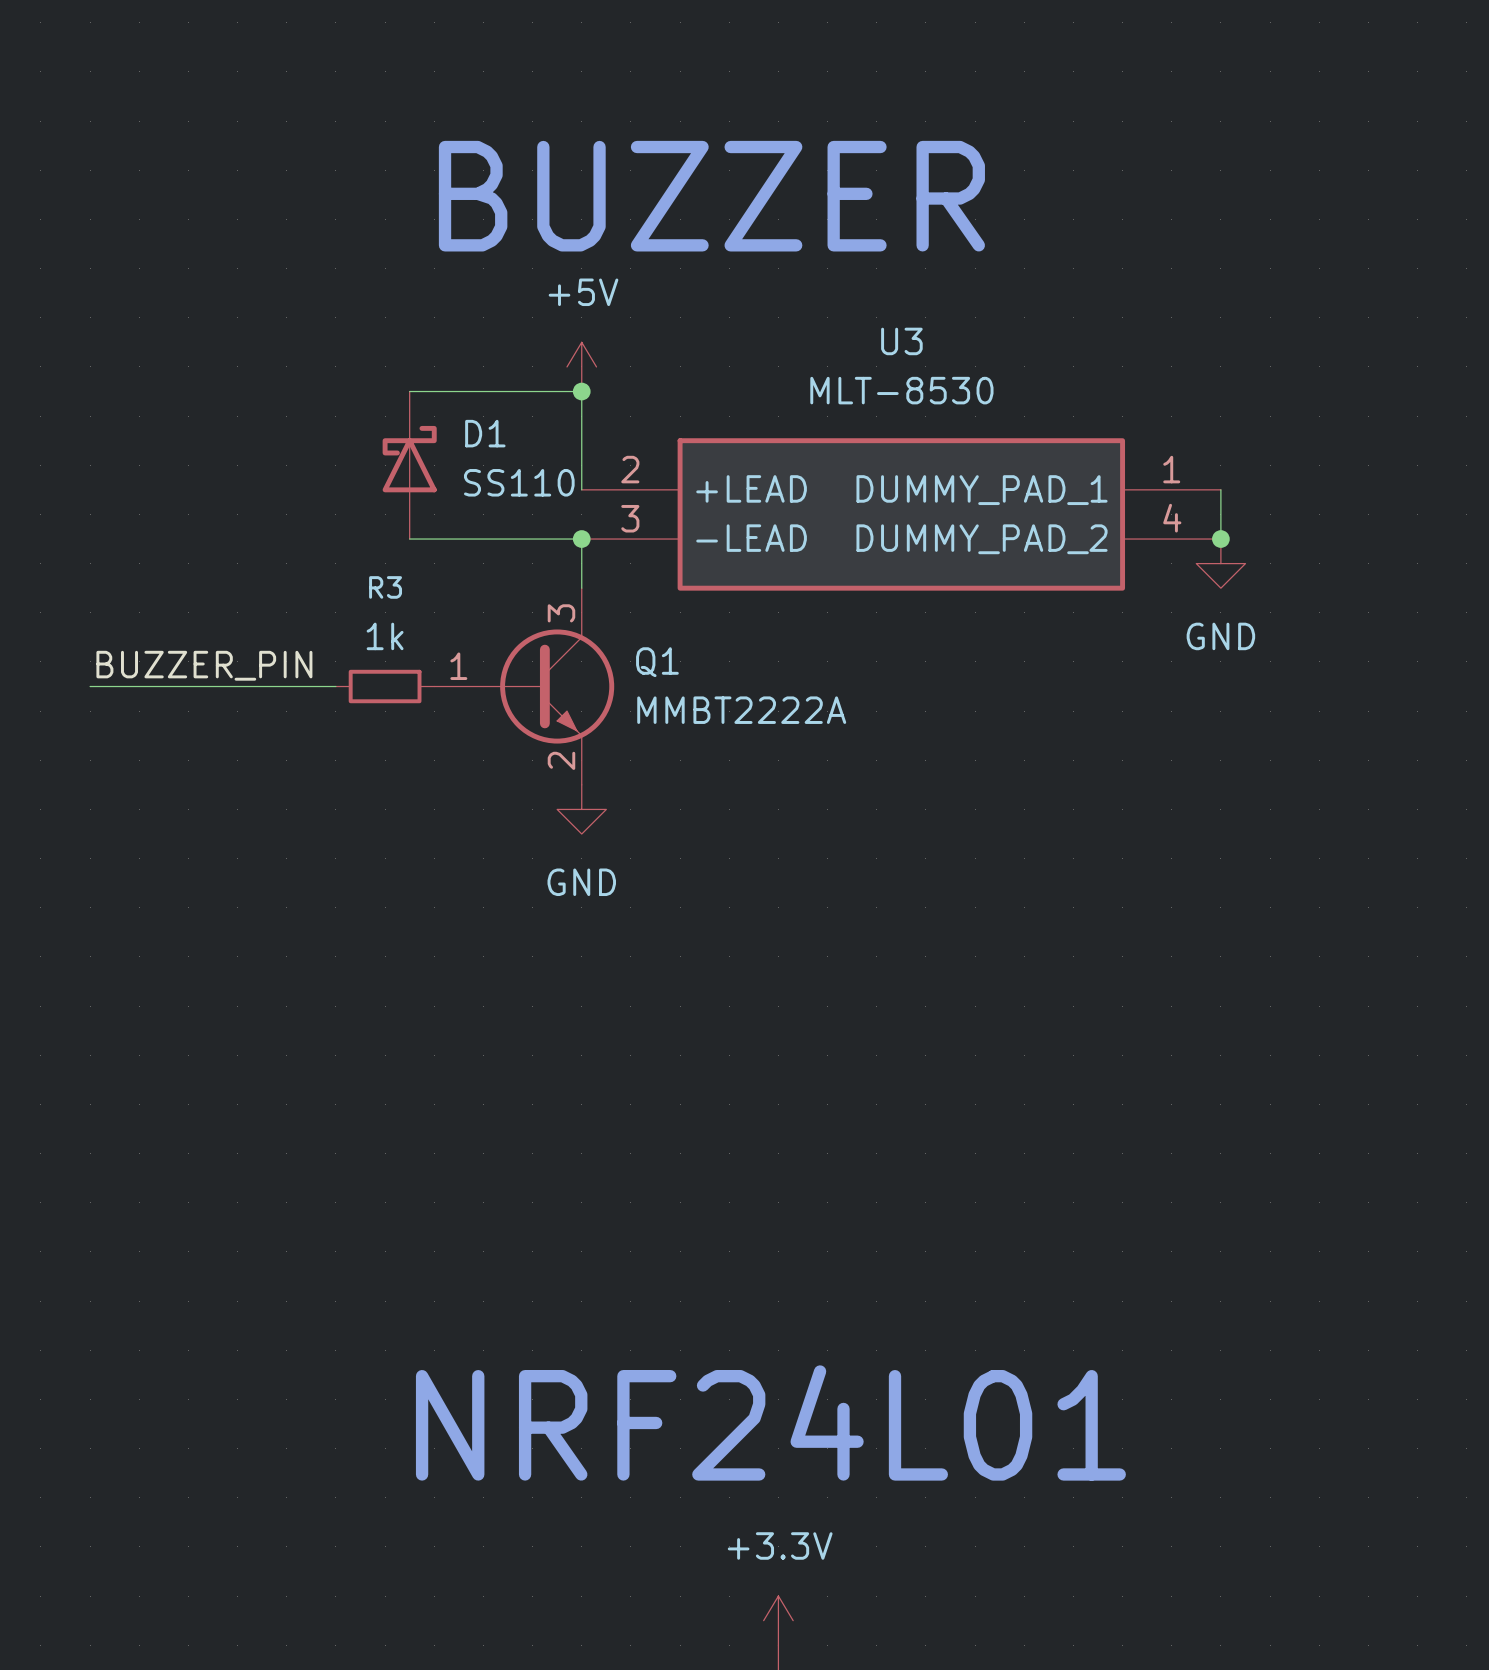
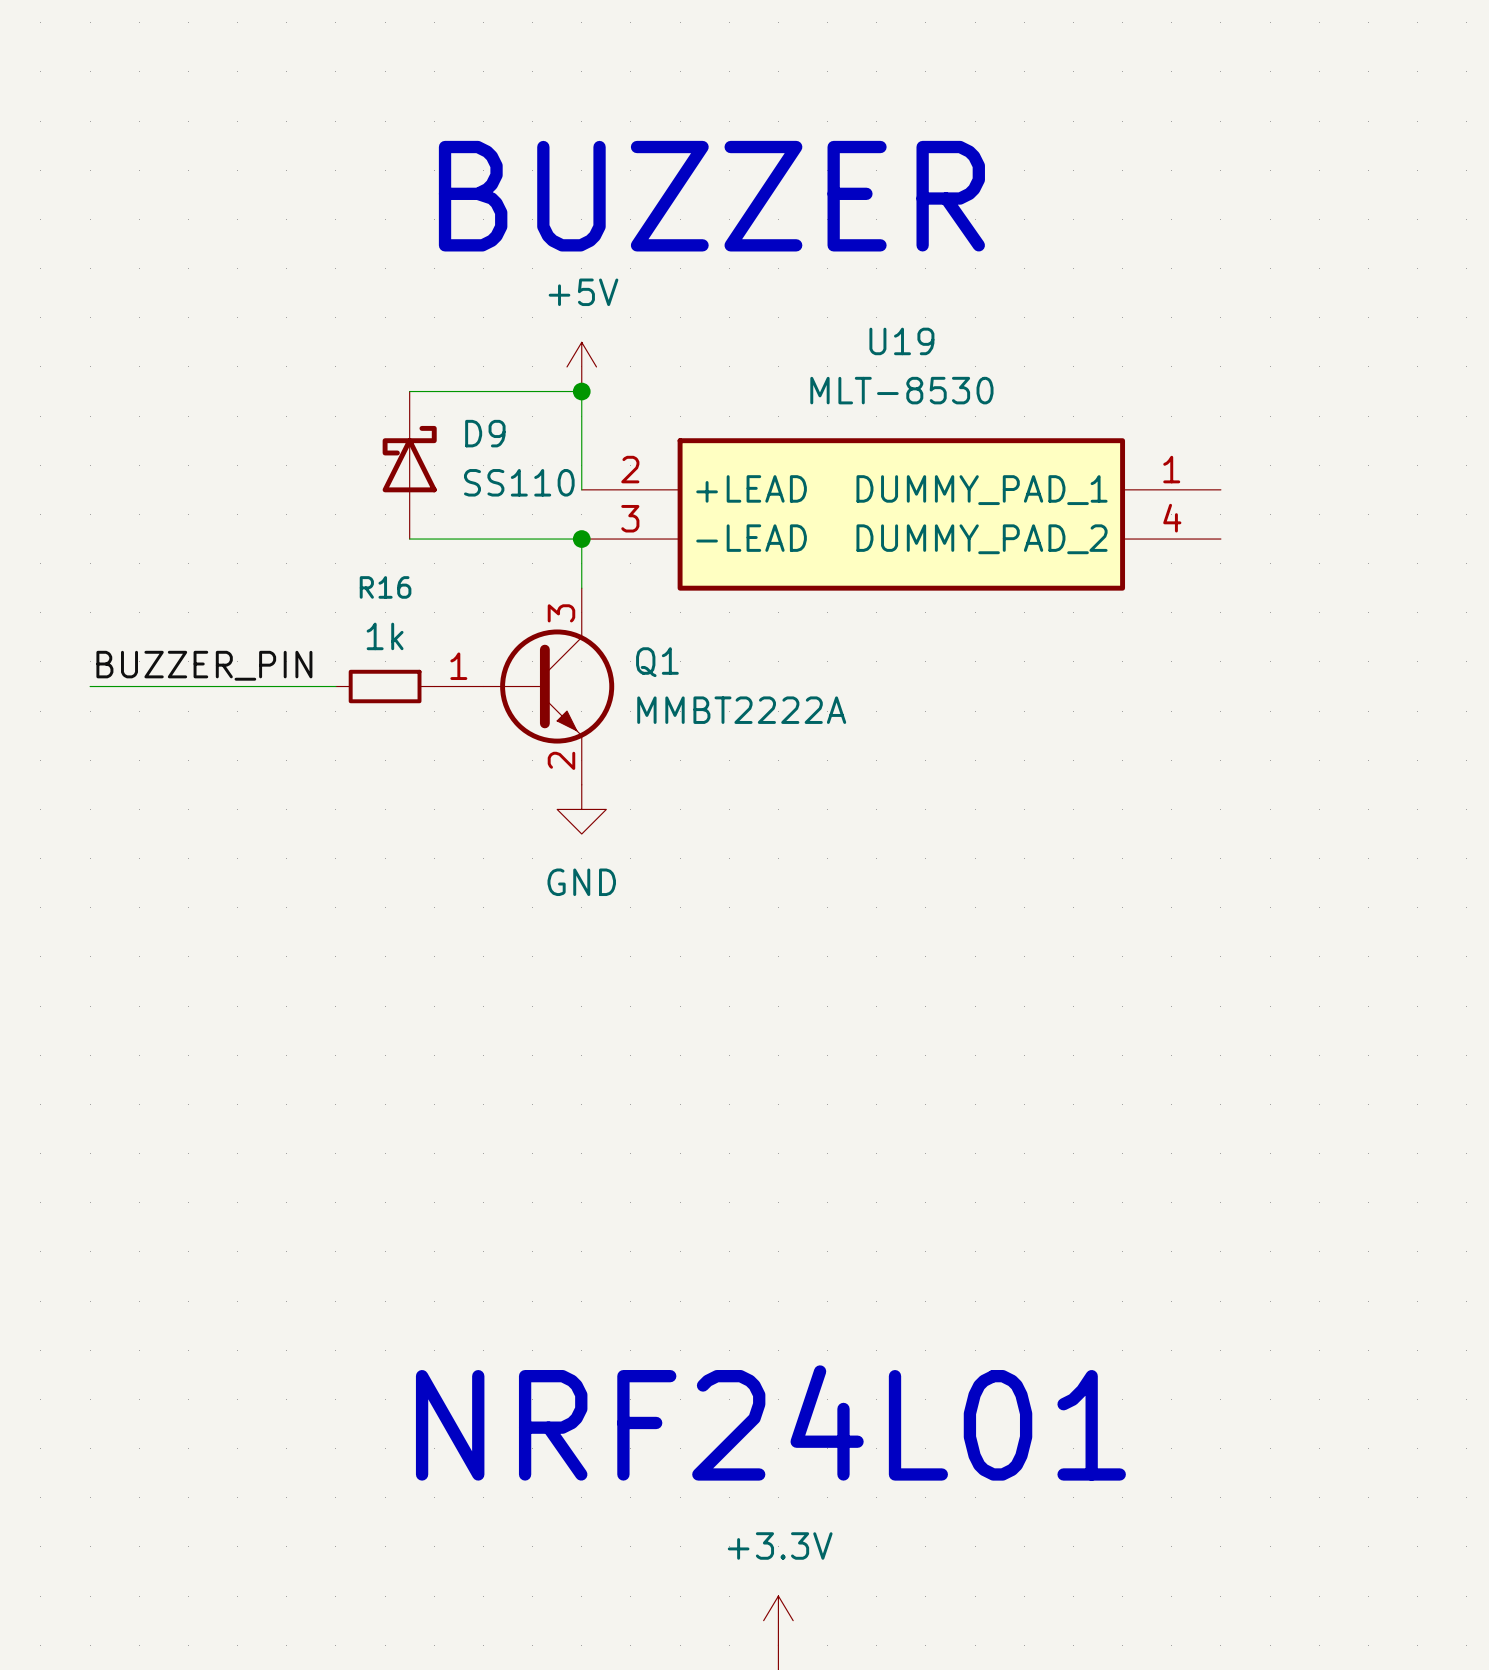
U3 name: U3 (901, 341) -> U19 (901, 341)
D1 name: D1 (485, 433) -> D9 (485, 433)
wire: (1220, 489) (1220, 539) -> none
junction: (1220, 539) -> none
power symbol: GND (1220, 563) -> none
R3 name: R3 (385, 587) -> R16 (385, 587)

